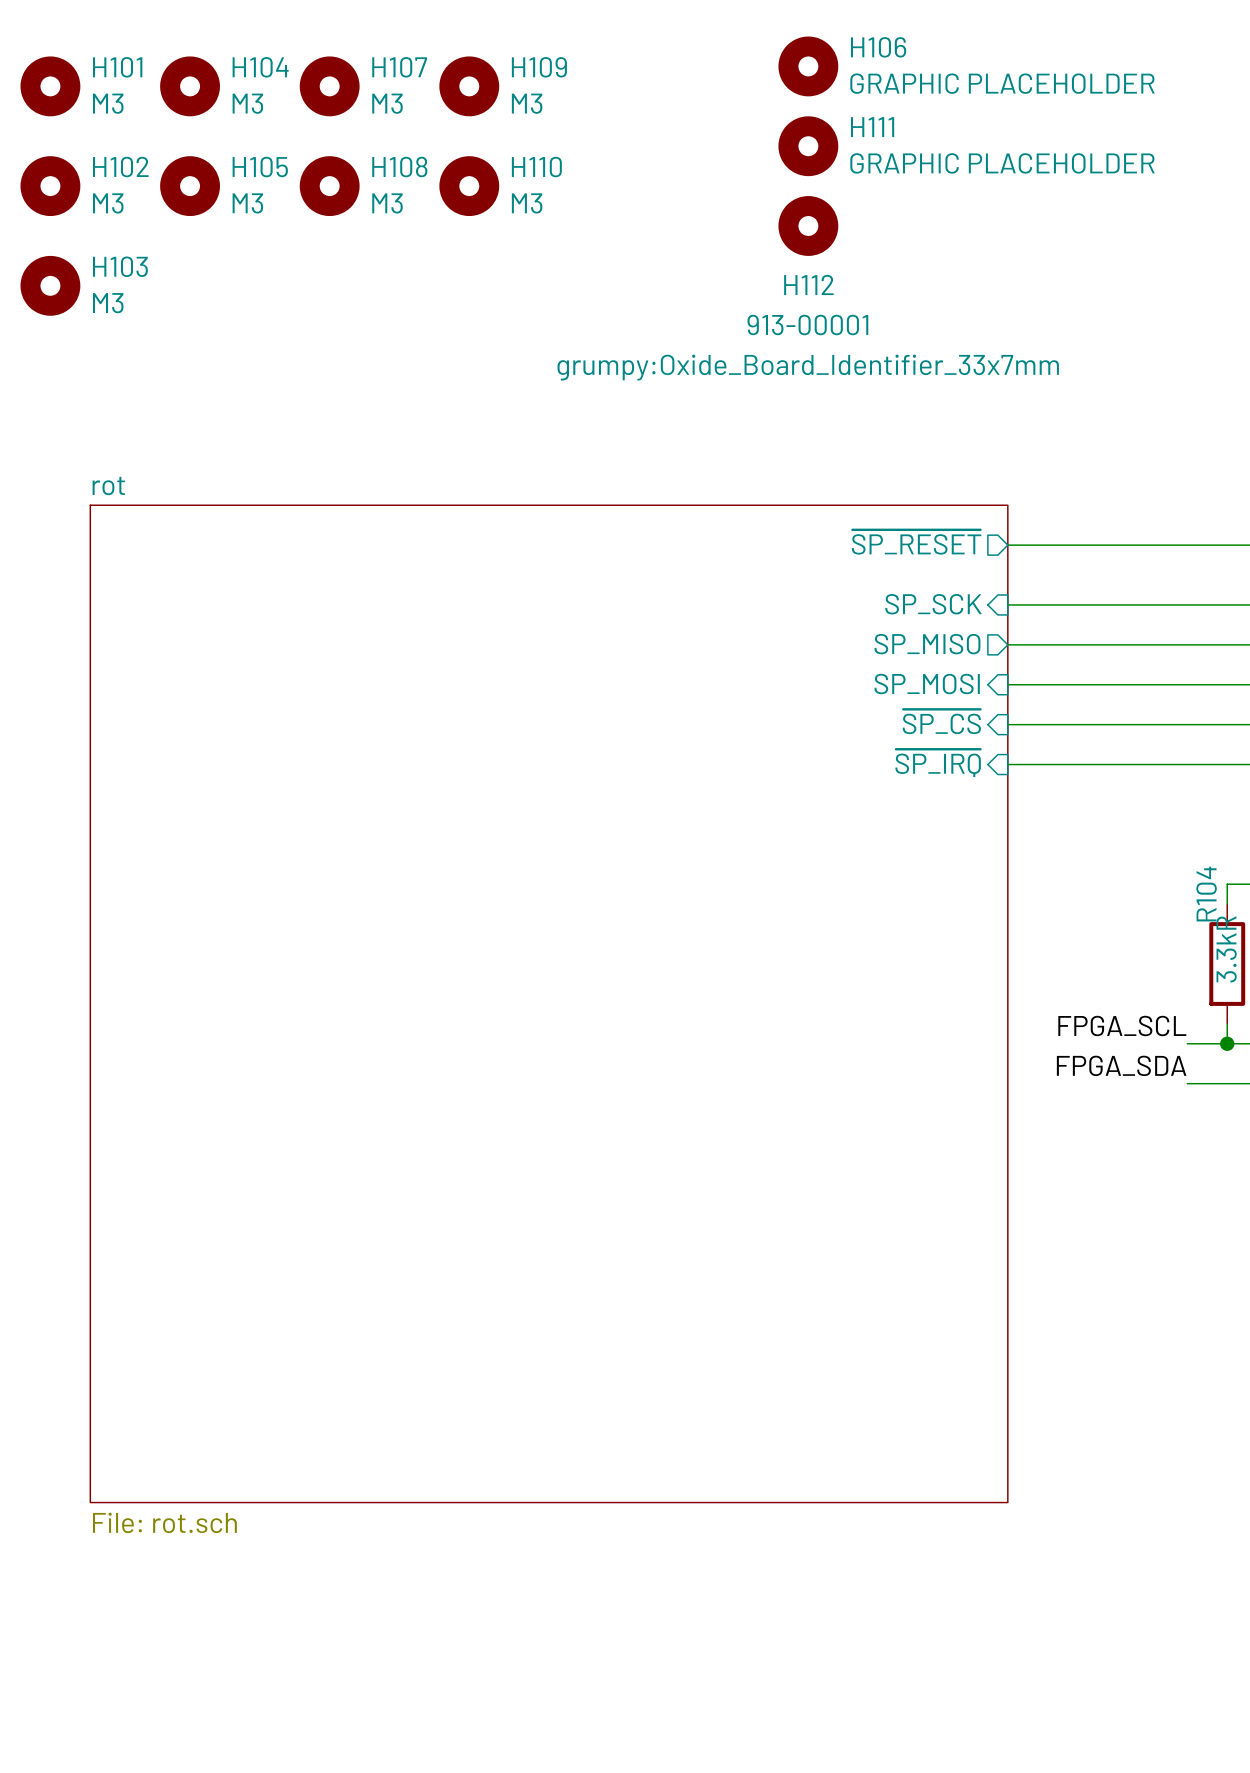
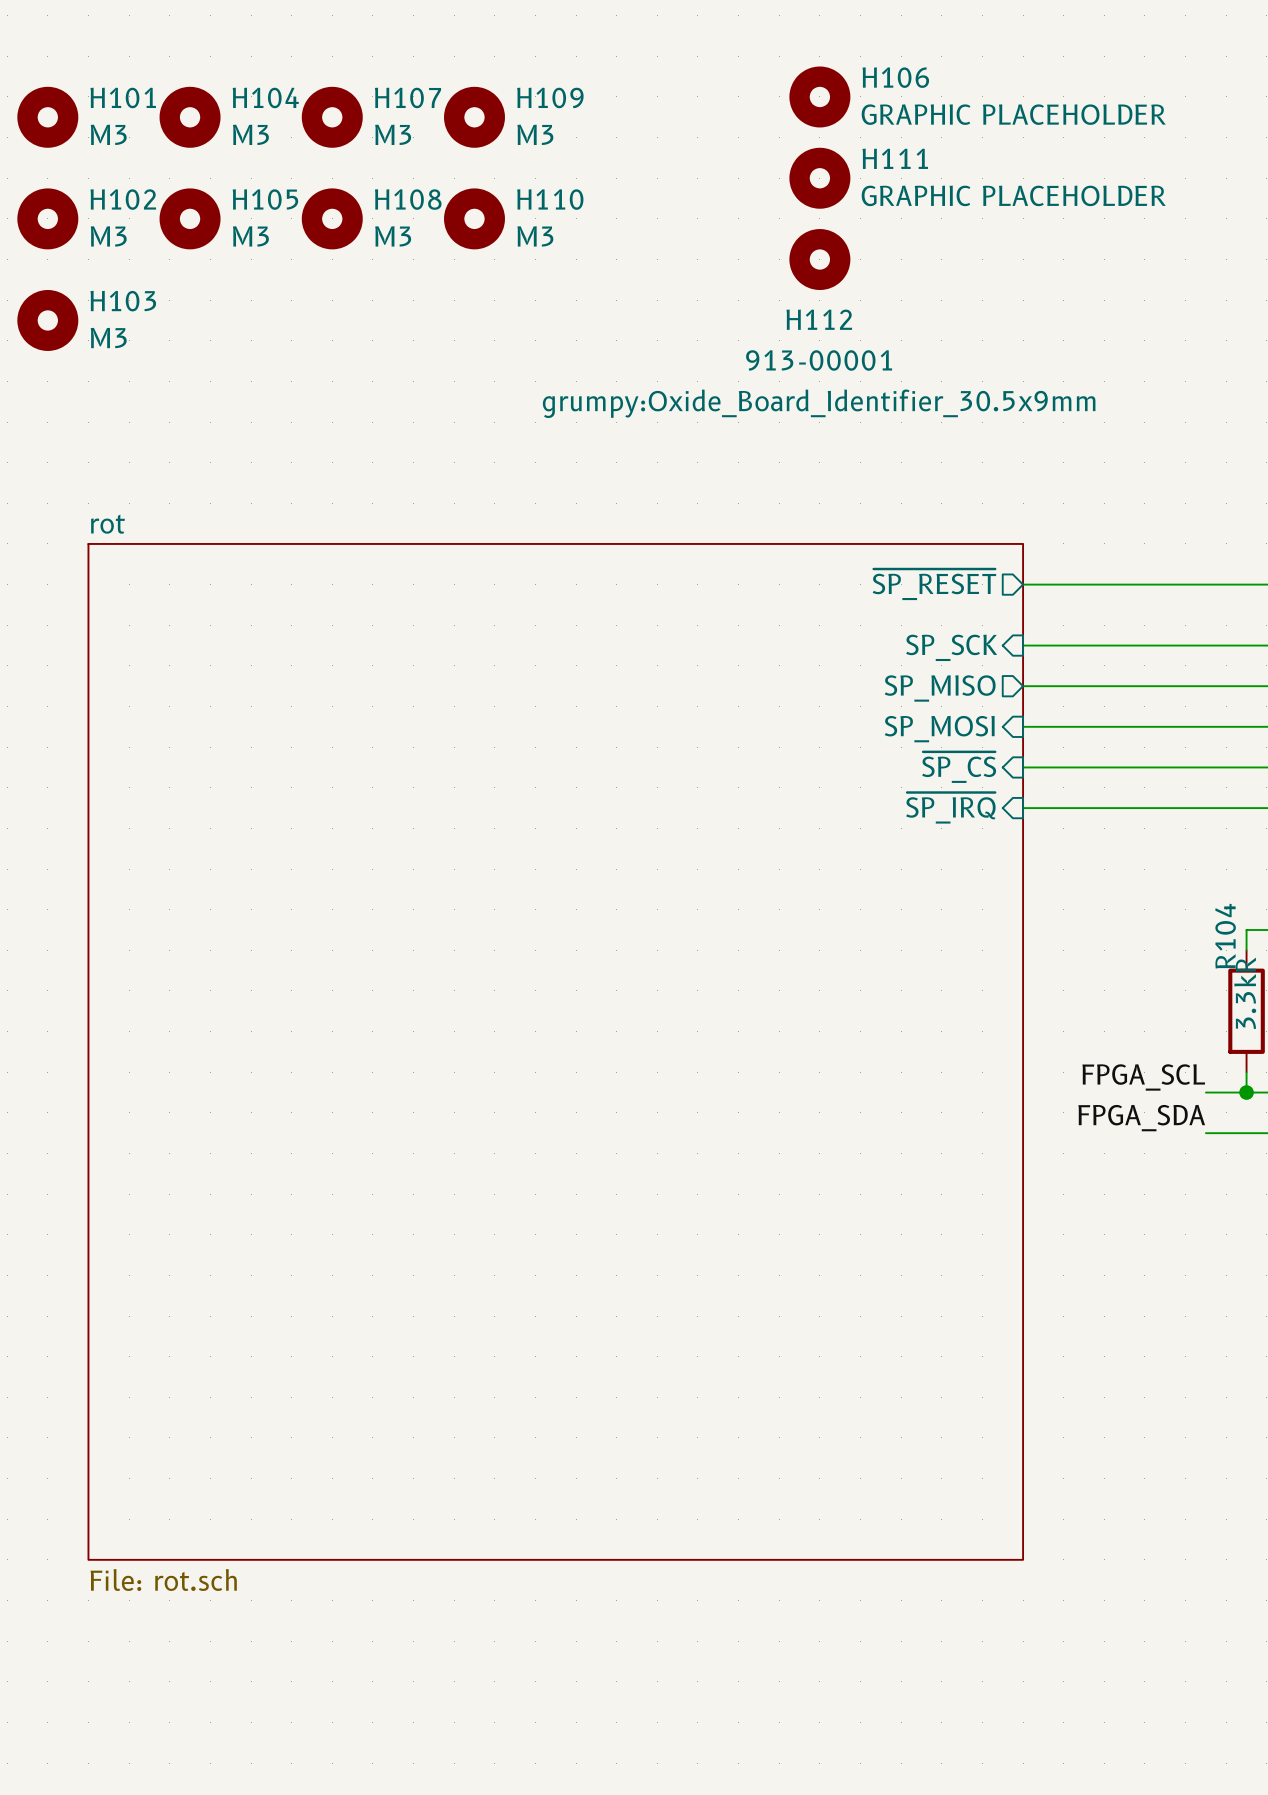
H112 text: grumpy:Oxide_Board_Identifier_33x7mm (808, 367) -> grumpy:Oxide_Board_Identifier_30.5x9mm (819, 403)

